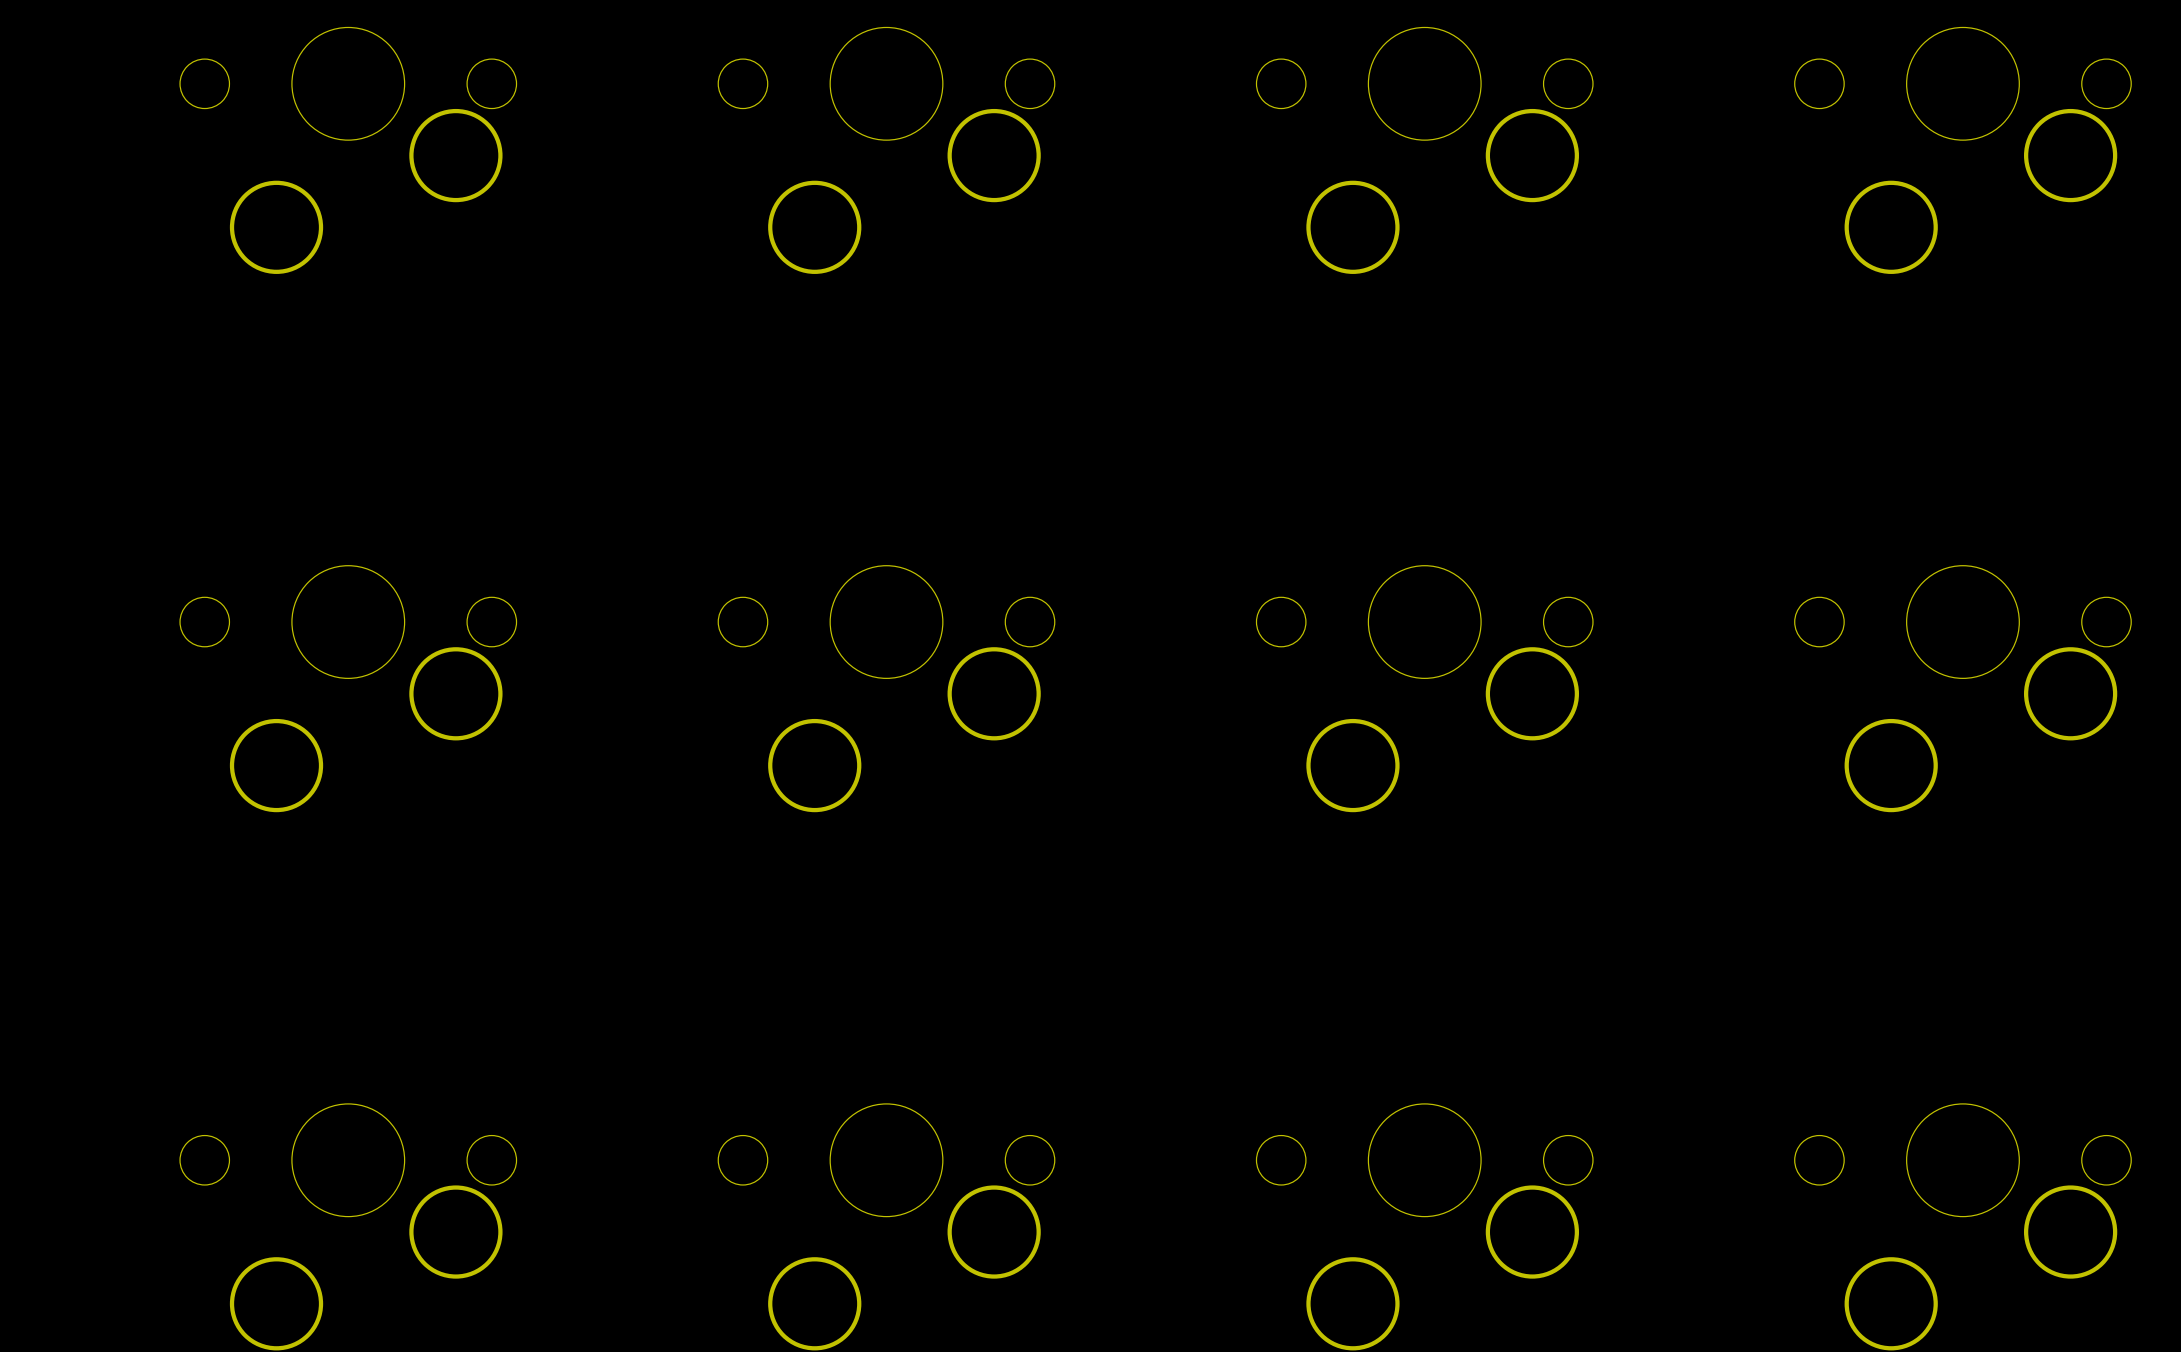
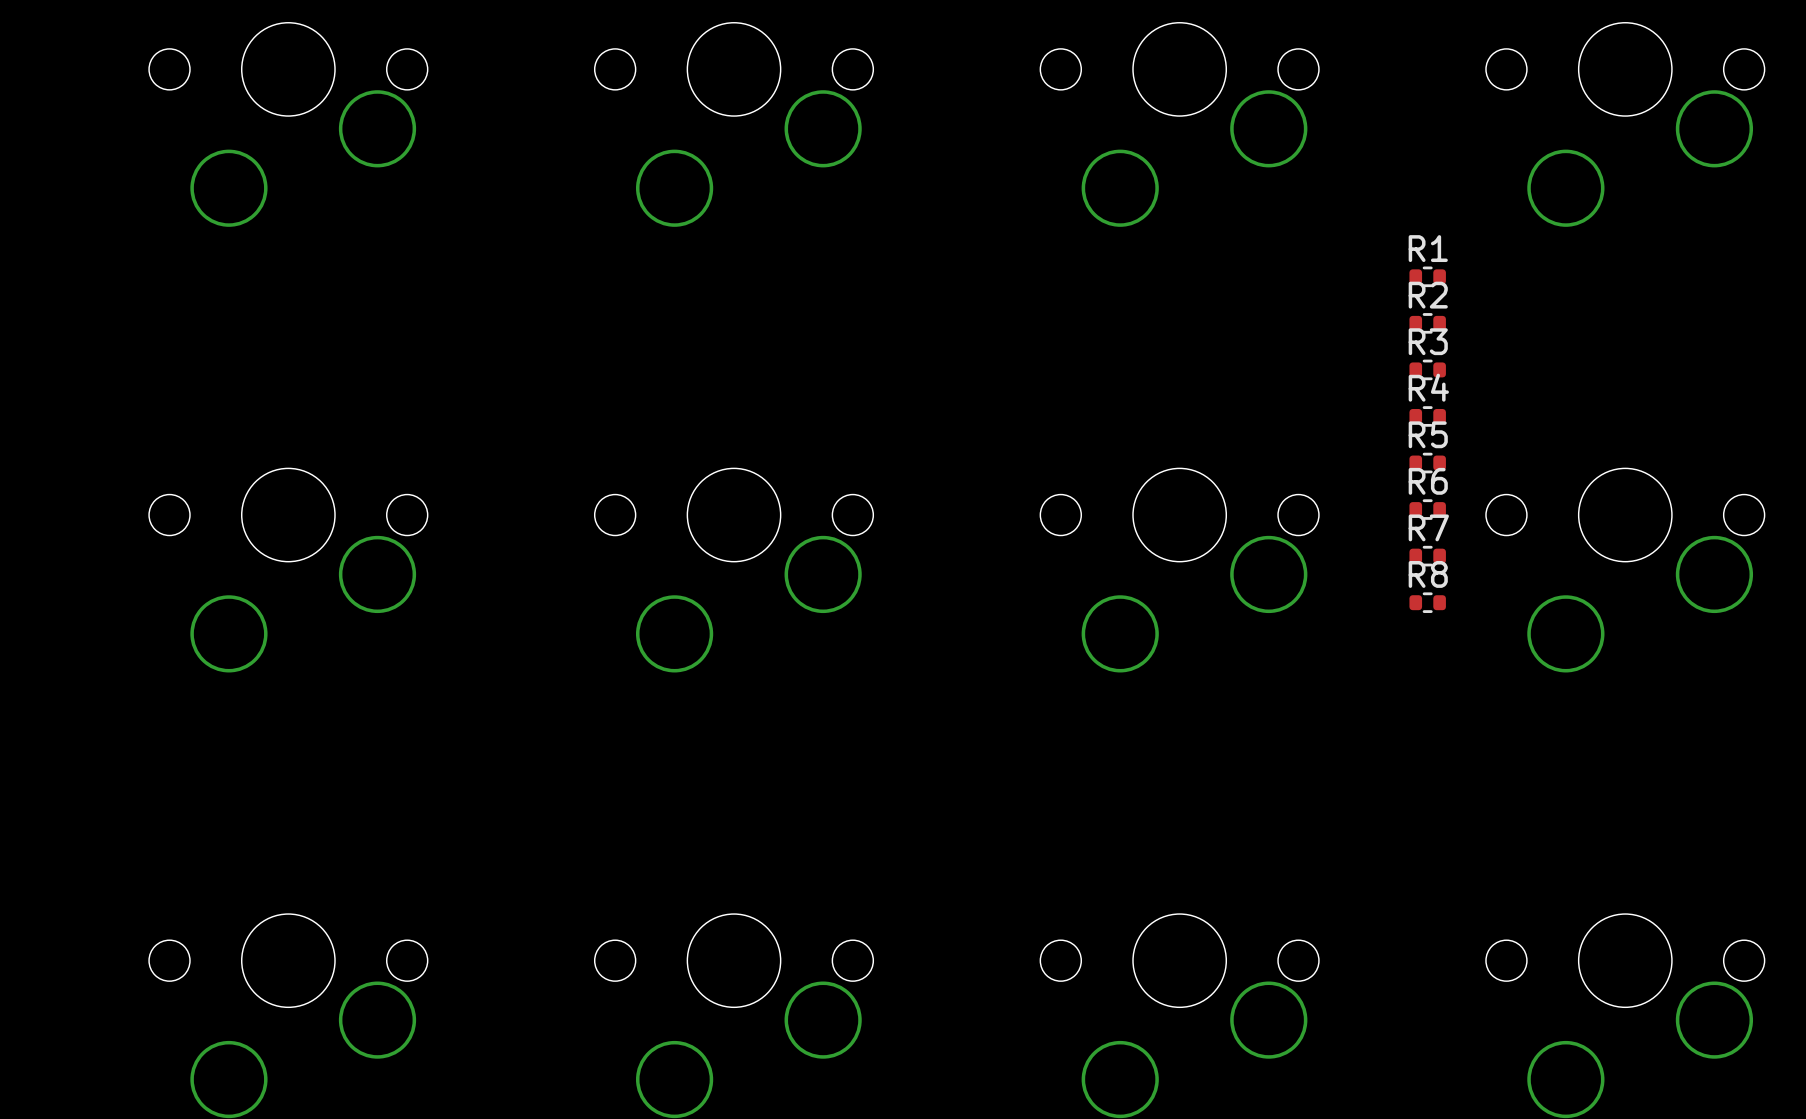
R1: none -> (1427, 276)
R2: none -> (1427, 323)
R3: none -> (1427, 369)
R4: none -> (1427, 416)
R5: none -> (1427, 463)
R6: none -> (1427, 509)
R7: none -> (1427, 556)
R8: none -> (1427, 602)

